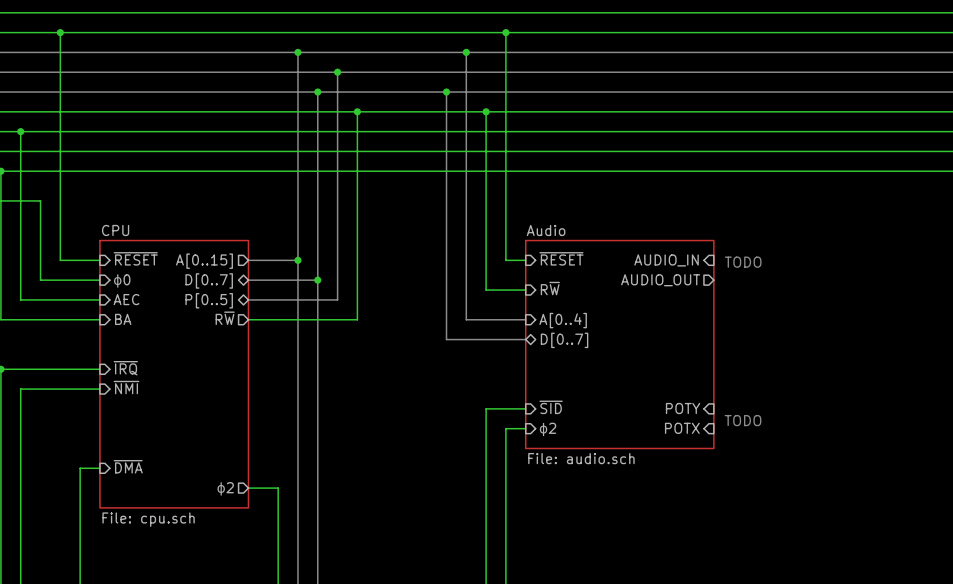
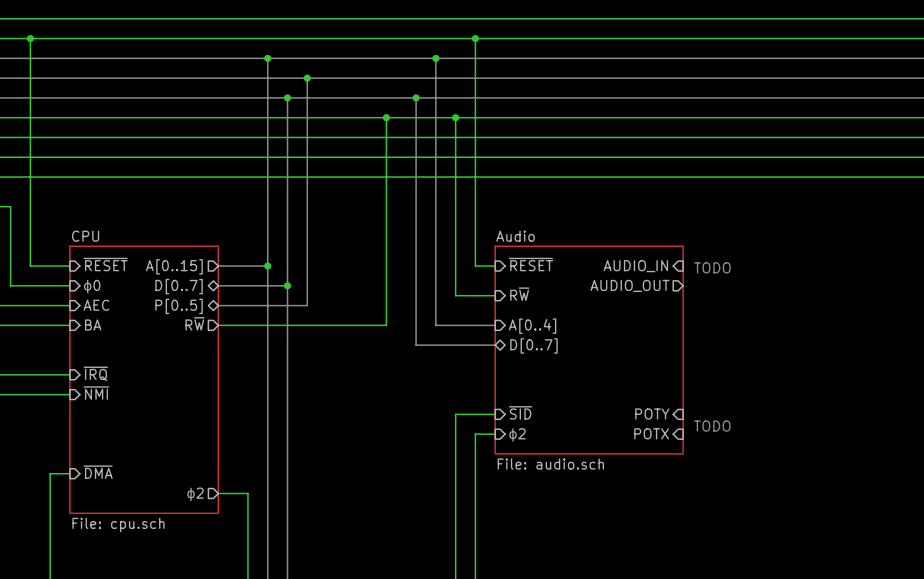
wire: (357, 111) (357, 319) -> (386, 117) (386, 325) (327, 325)
junction: (357, 111) -> none
junction: none -> (386, 117)

